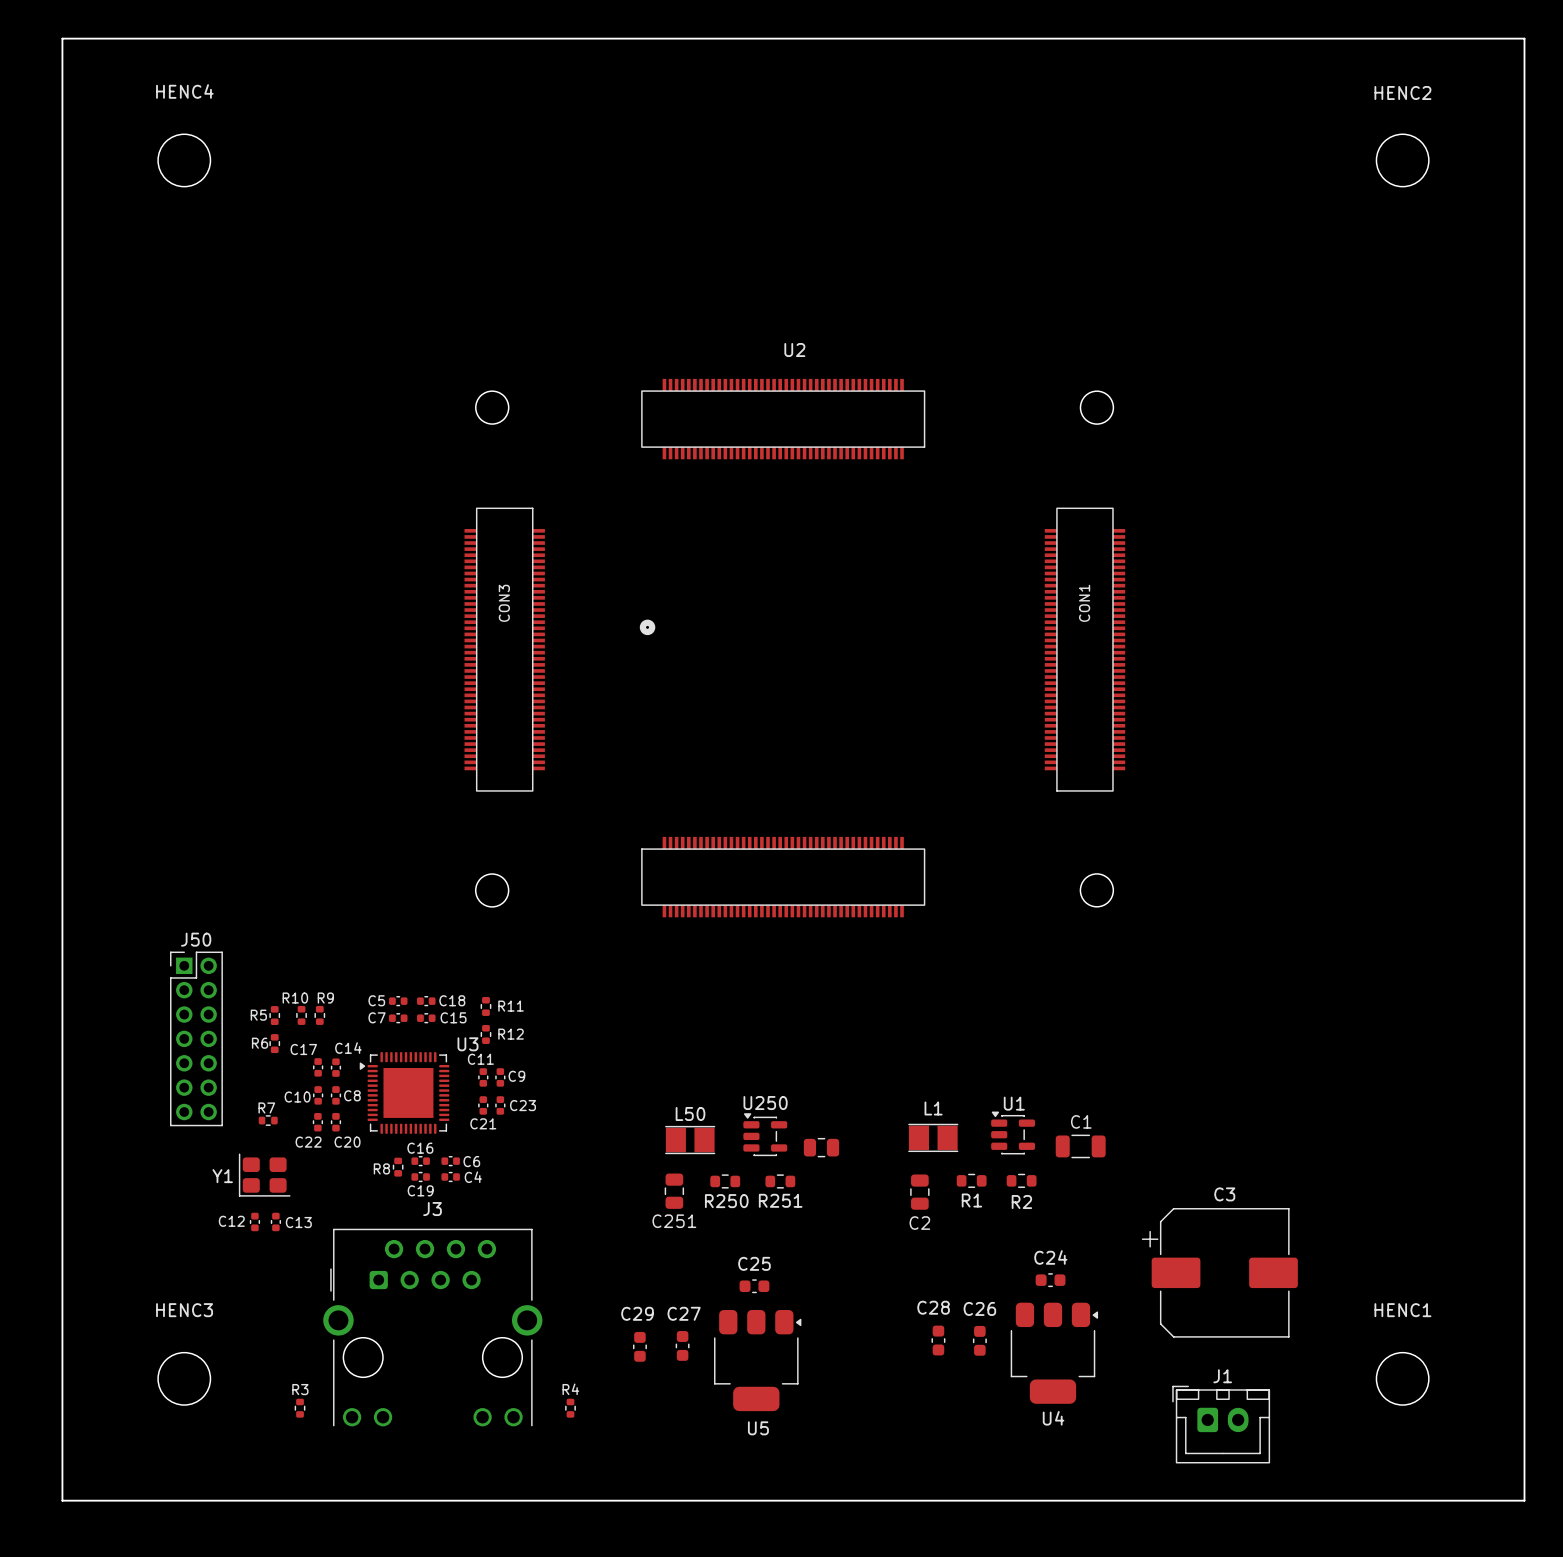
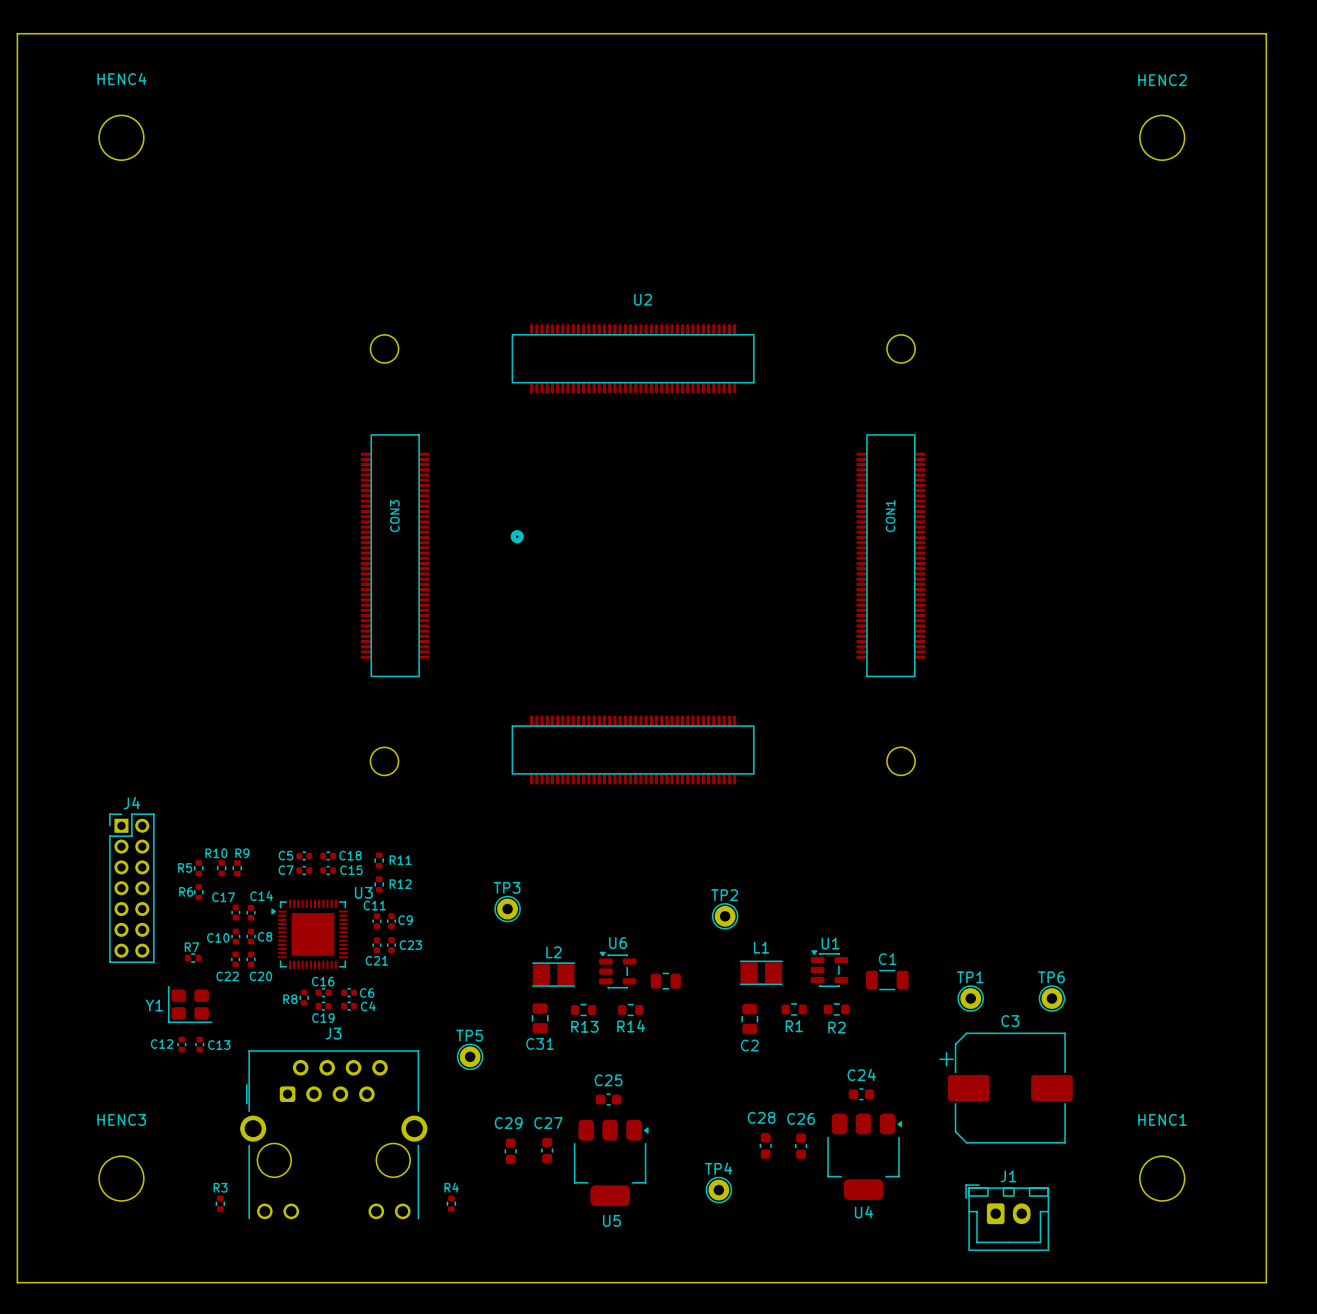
J50 name: J50 (196, 939) -> J4 (131, 803)
TP3: none -> (507, 909)
TP2: none -> (725, 916)
U250 name: U250 (765, 1103) -> U6 (618, 942)
L50 name: L50 (690, 1113) -> L2 (553, 952)
TP1: none -> (970, 998)
TP6: none -> (1051, 998)
R251 name: R251 (780, 1200) -> R14 (631, 1026)
R250 name: R250 (726, 1201) -> R13 (584, 1026)
C251 name: C251 (674, 1221) -> C31 (540, 1043)
TP5: none -> (470, 1056)
TP4: none -> (718, 1190)

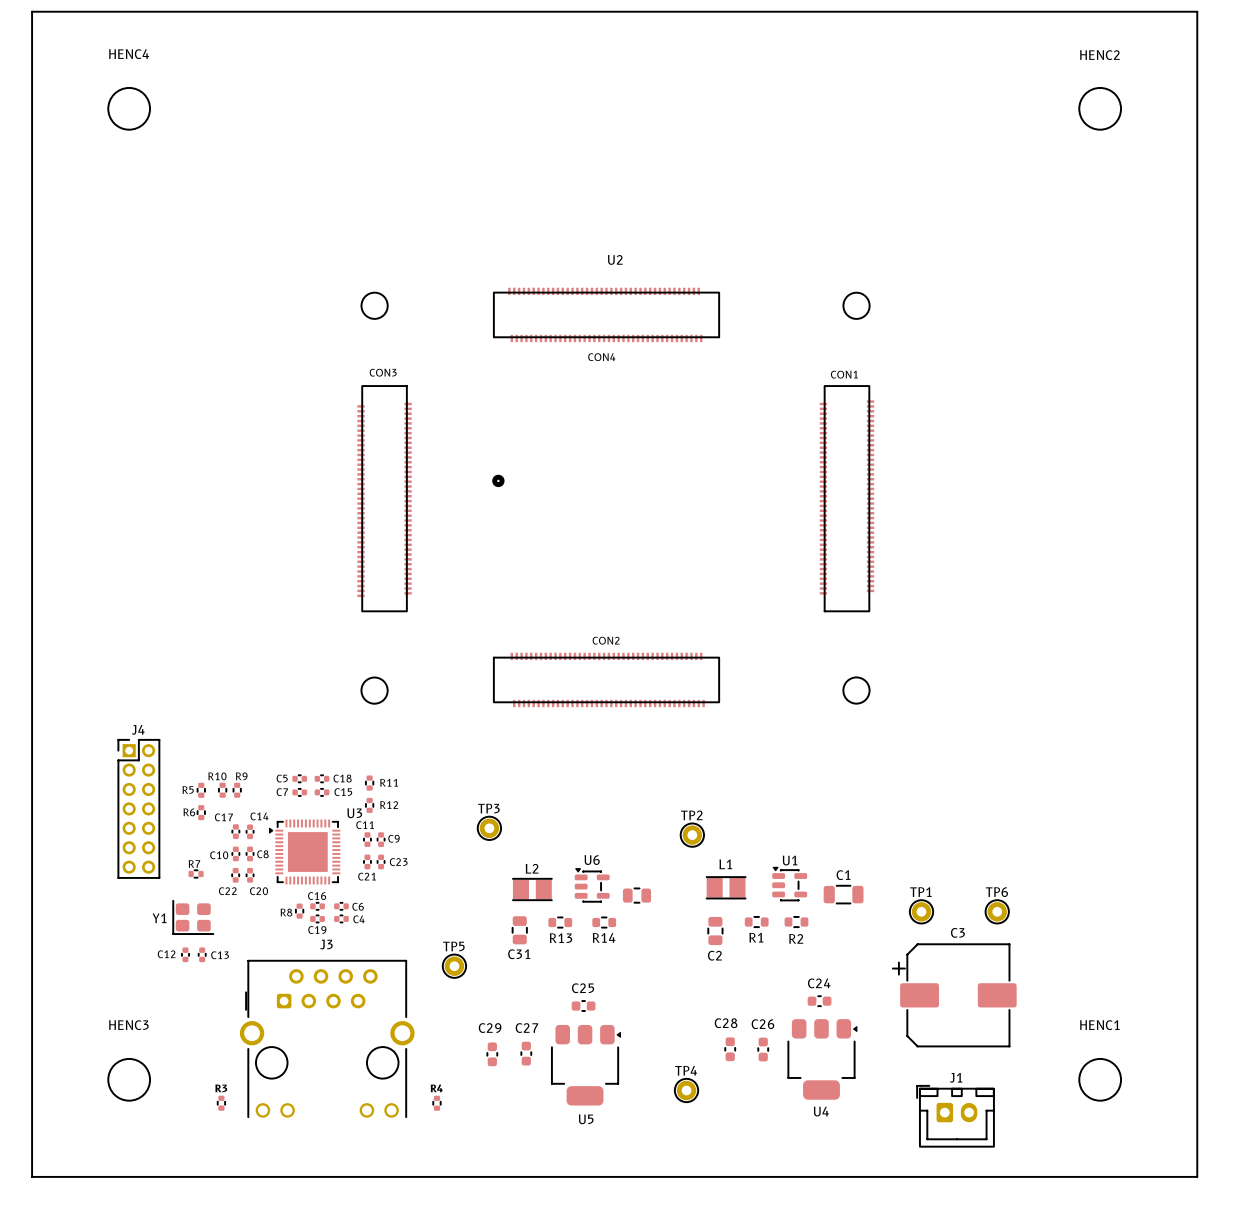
U2 footprint: [360, 324, 926, 785] -> [357, 287, 875, 708]

